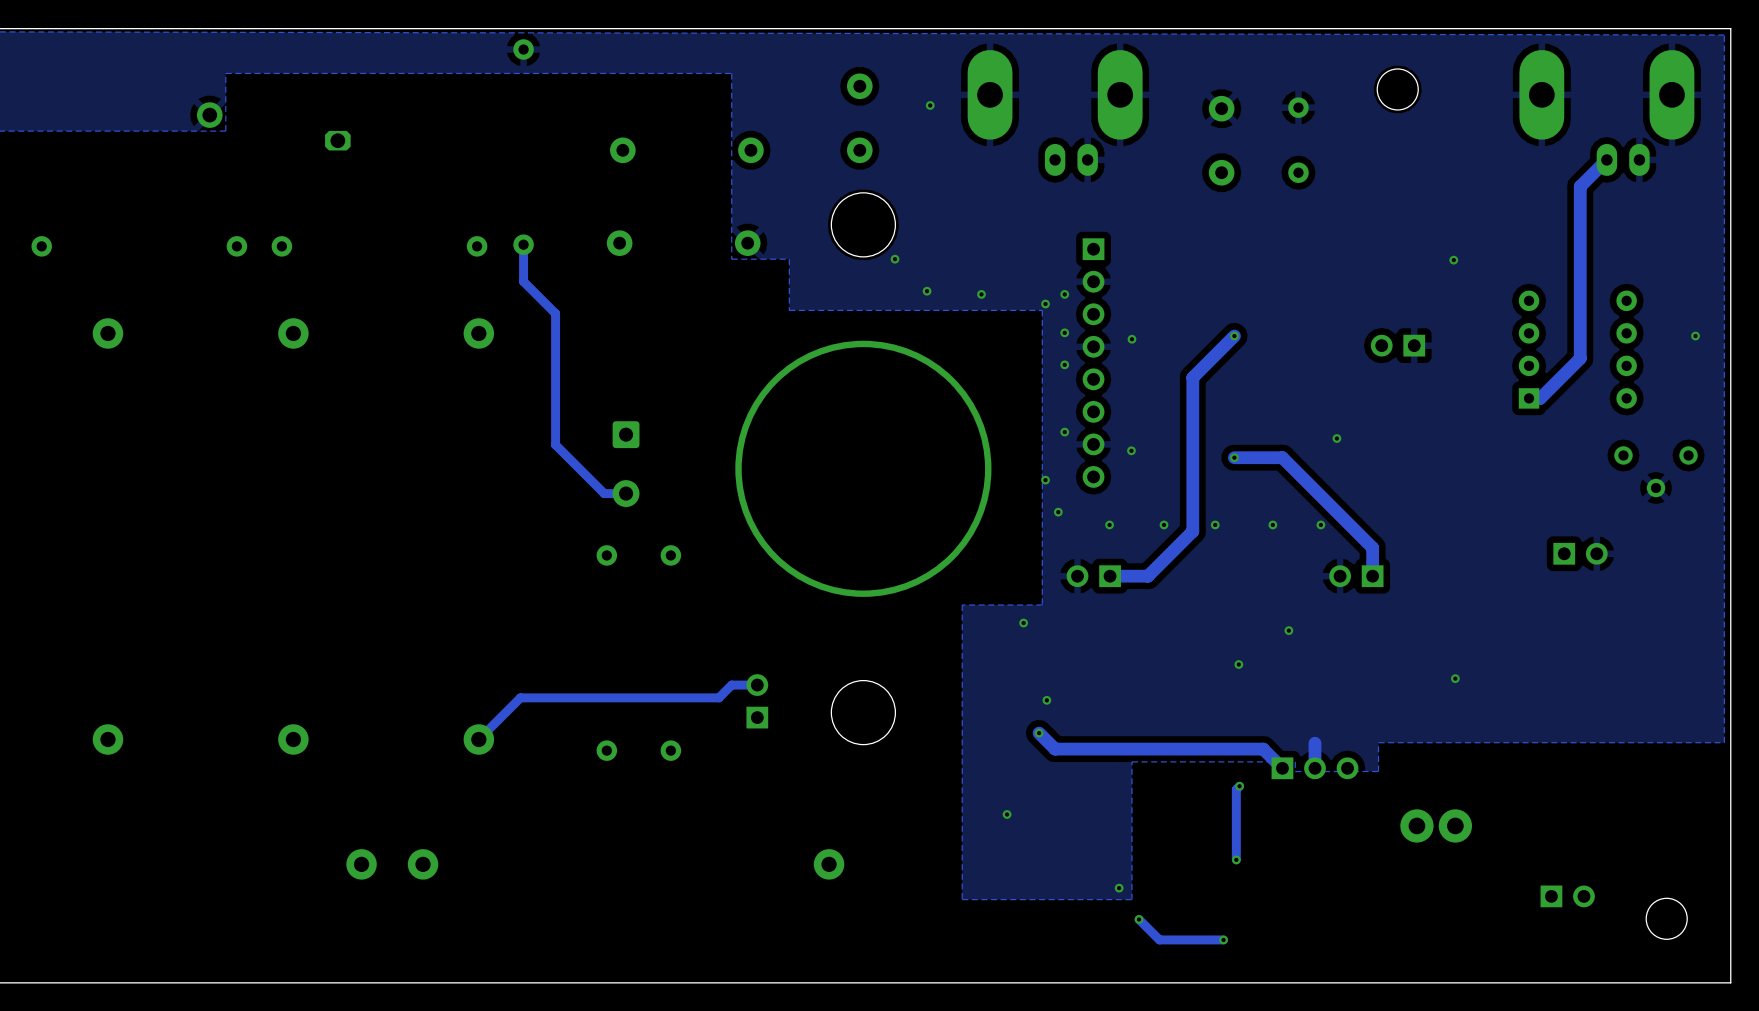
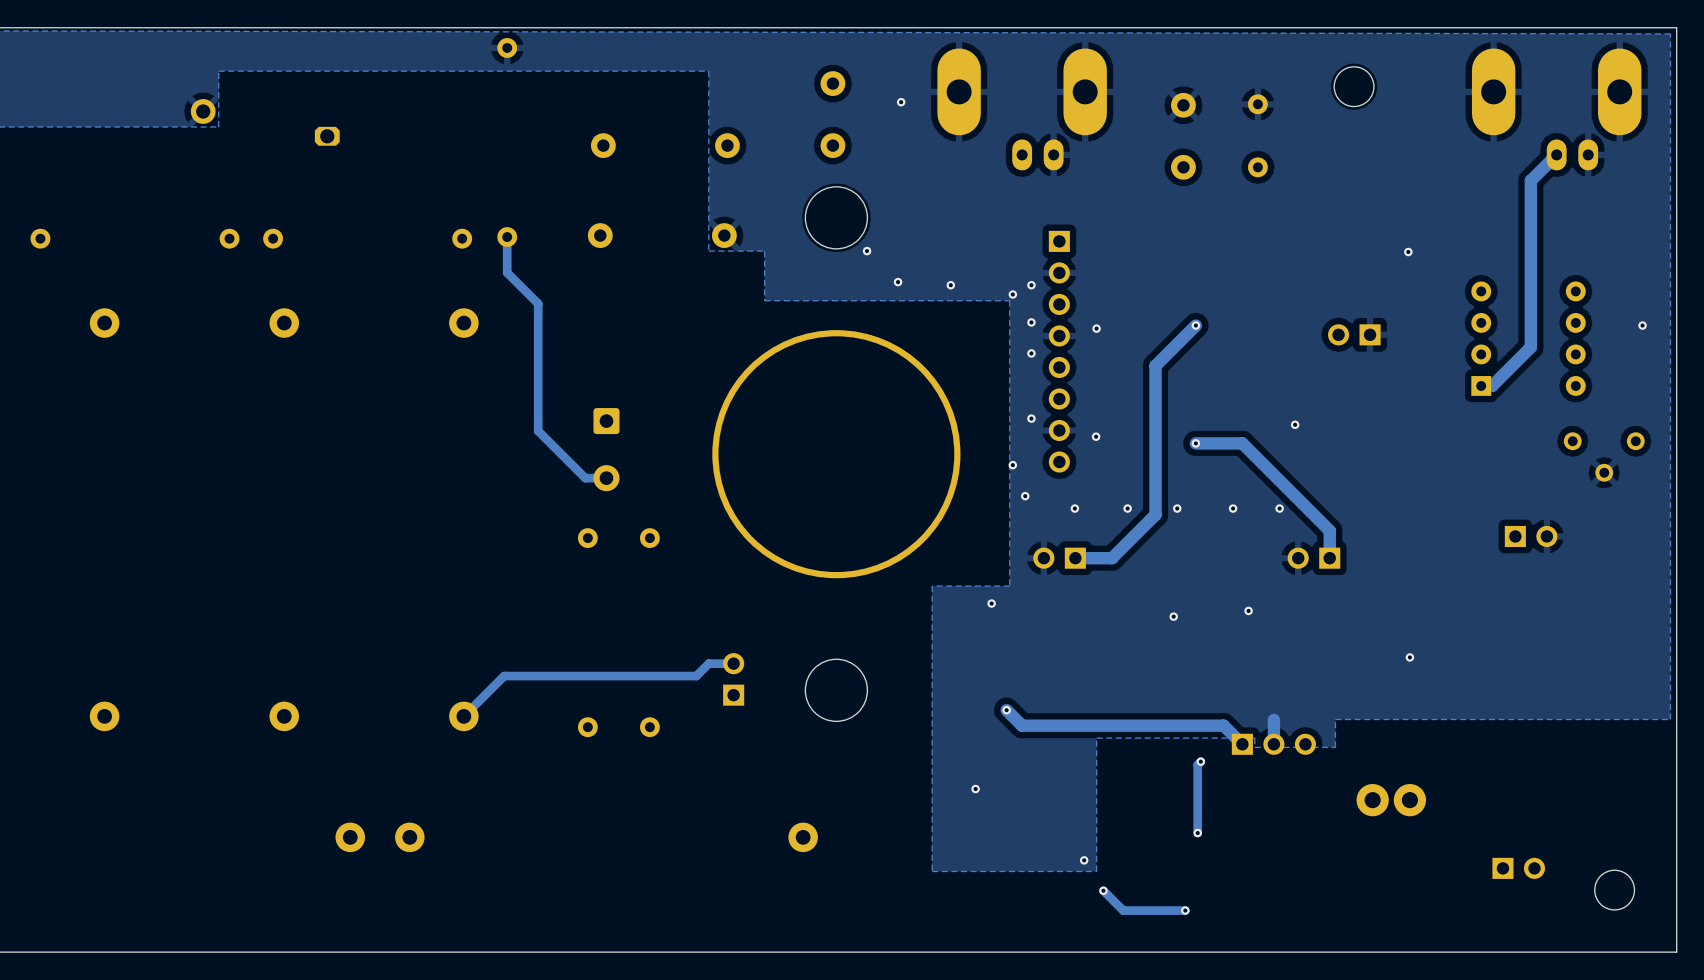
via position: (1238, 664) -> (1173, 616)
via: (1046, 700) -> none

